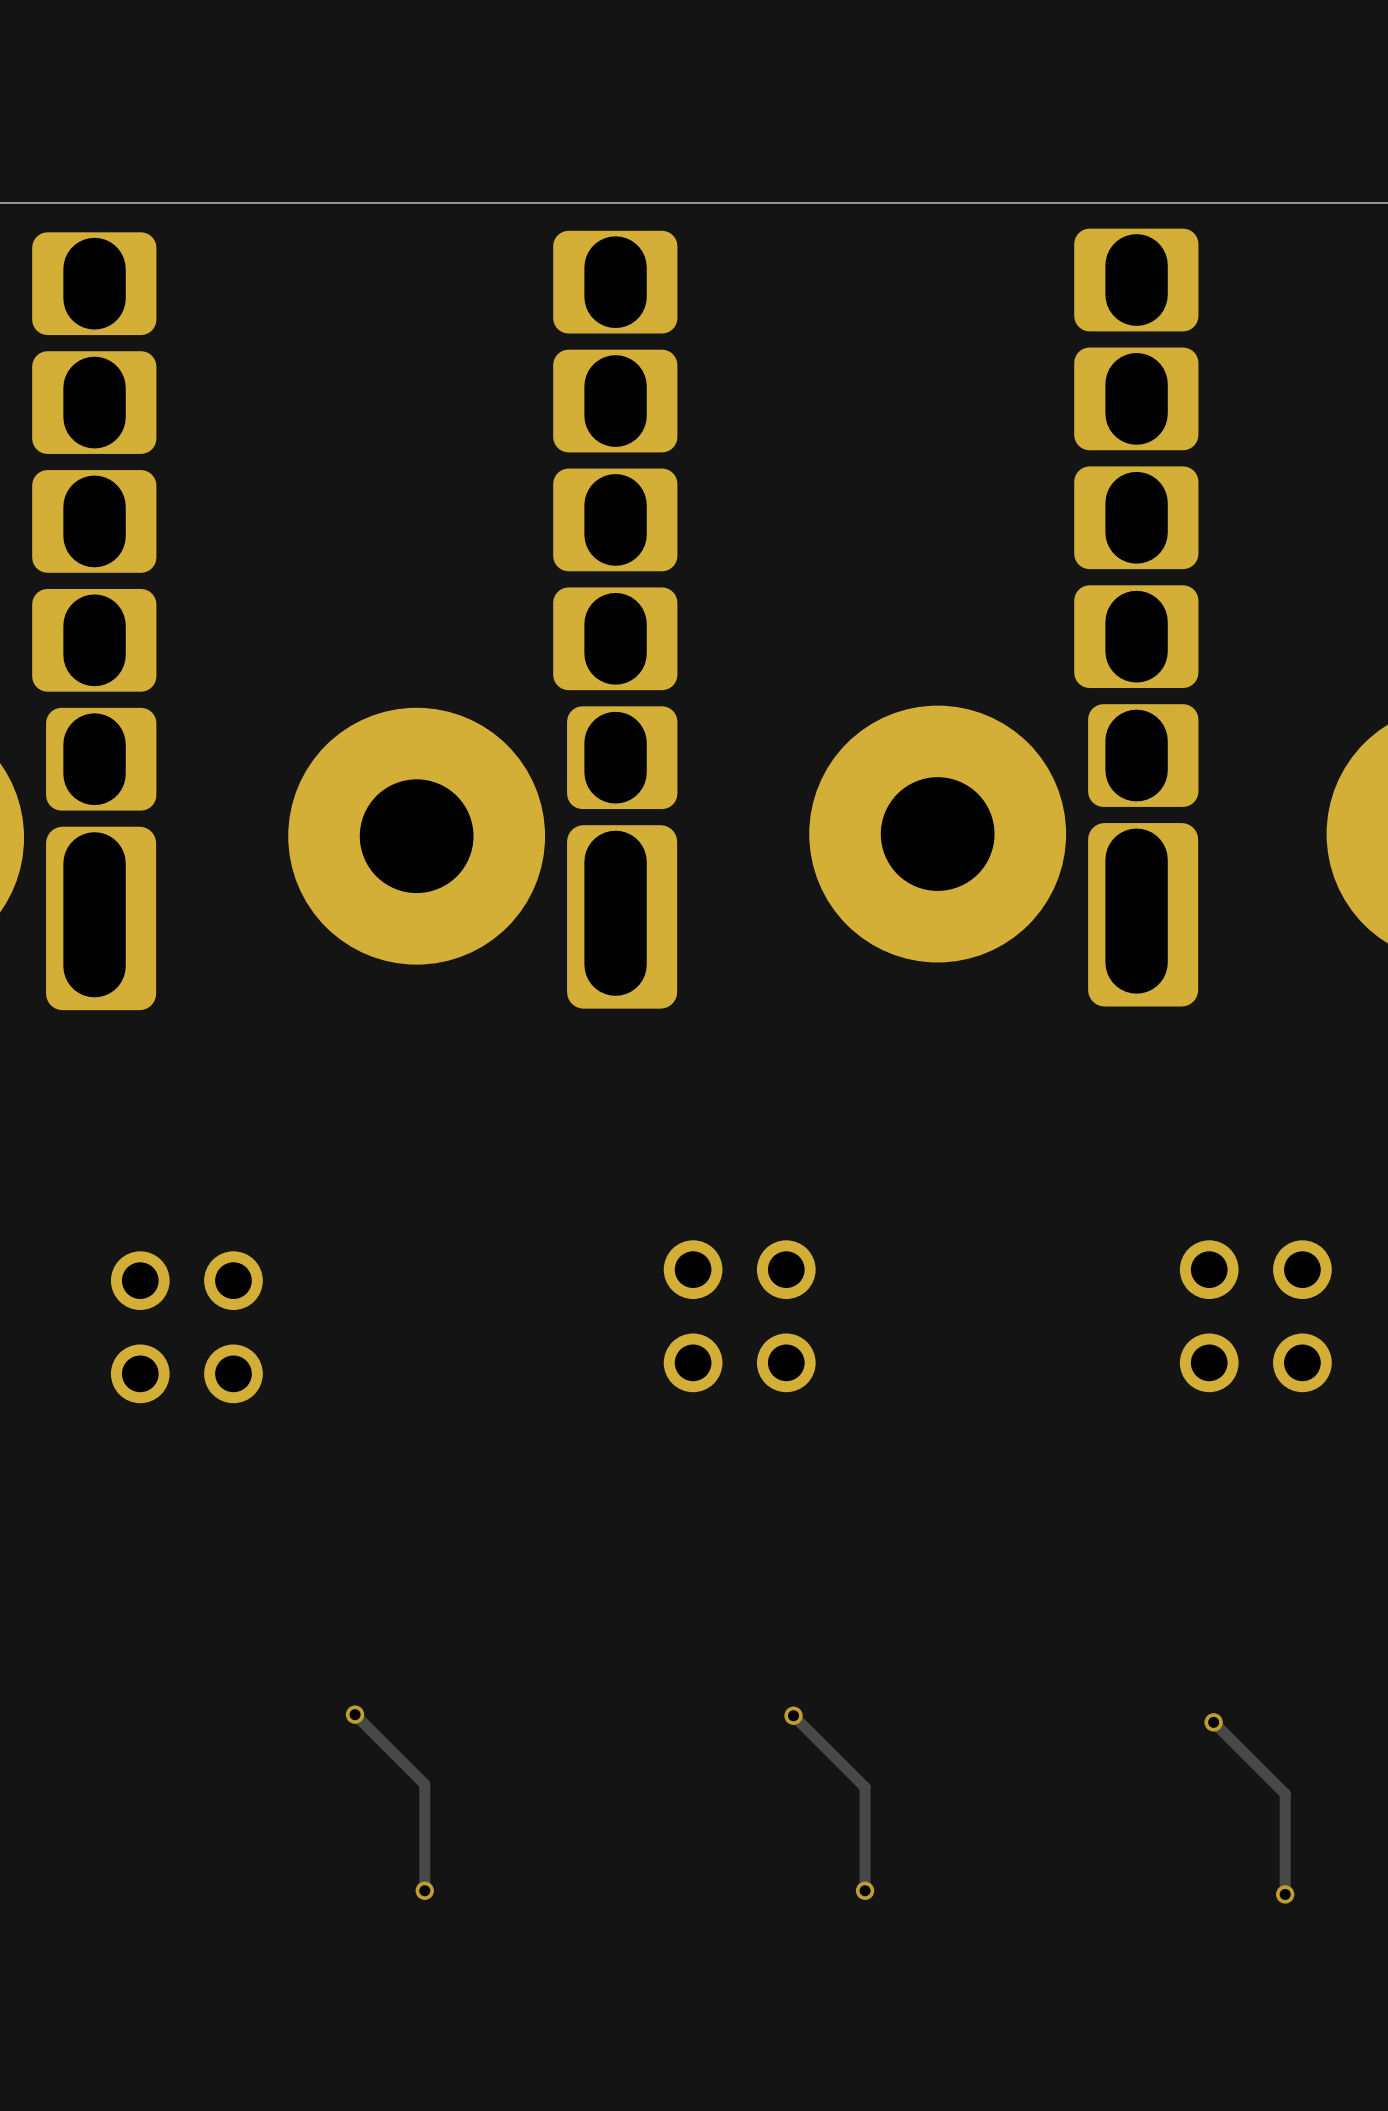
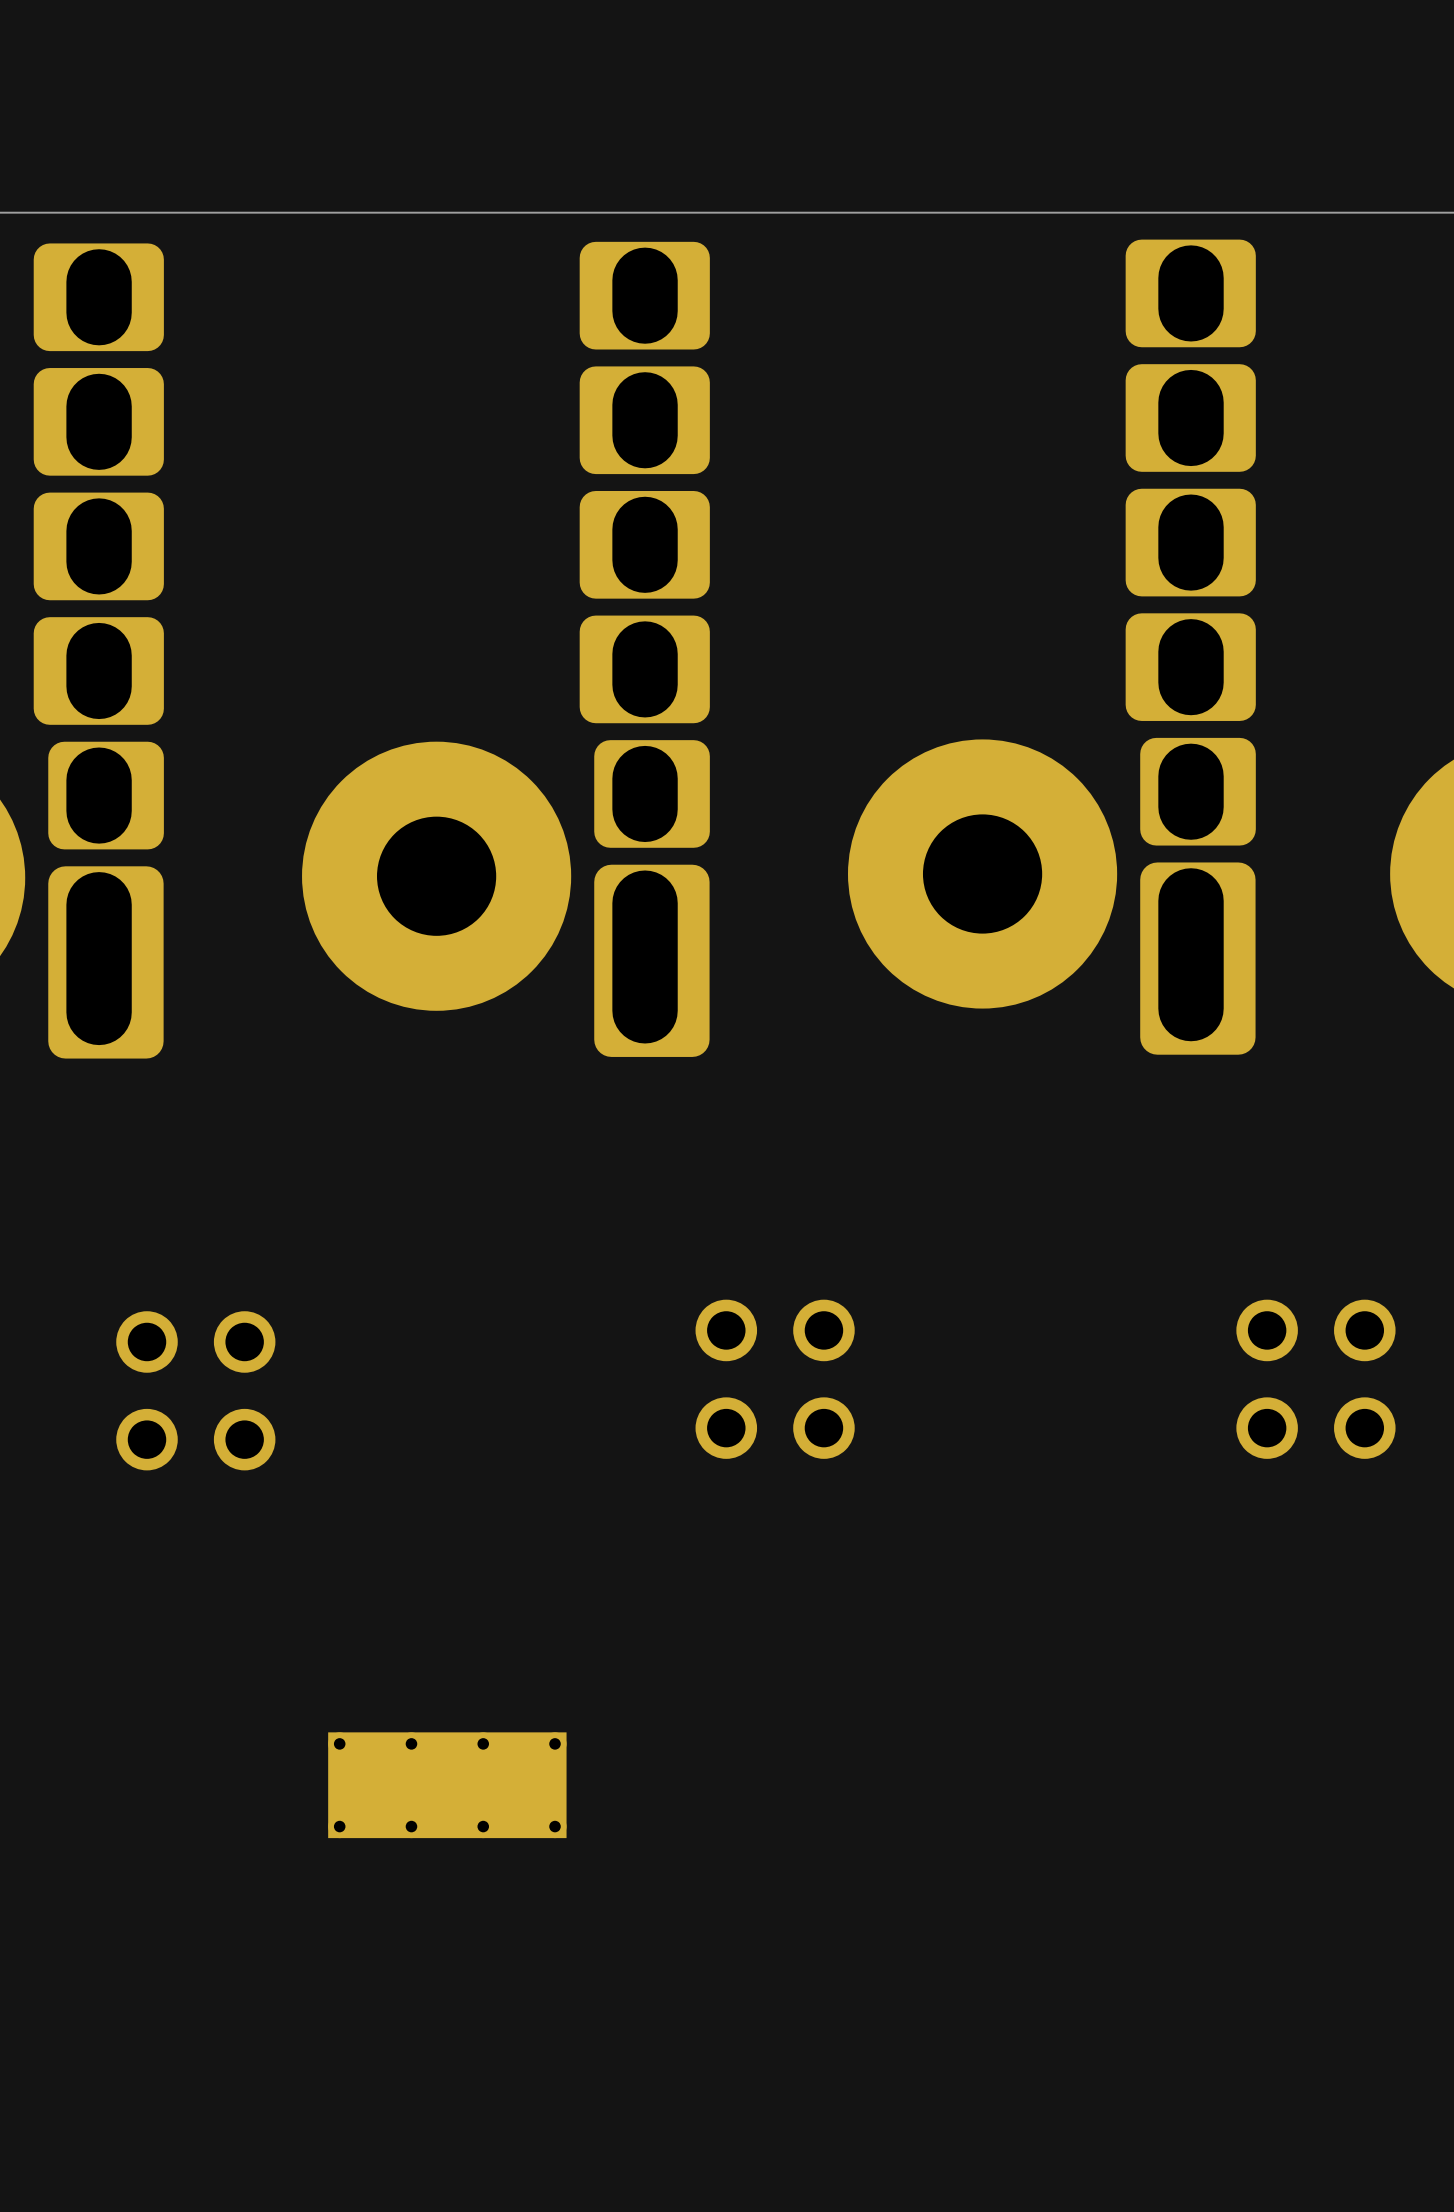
part: none -> (447, 1785)
track: (355, 1714) (424, 1784) (424, 1890) -> none
via: (355, 1714) -> none
track: (793, 1715) (865, 1787) (865, 1890) -> none
via: (793, 1715) -> none
track: (1213, 1722) (1285, 1793) (1285, 1894) -> none
via: (1213, 1722) -> none
via: (424, 1890) -> none
via: (865, 1890) -> none
via: (1285, 1894) -> none

